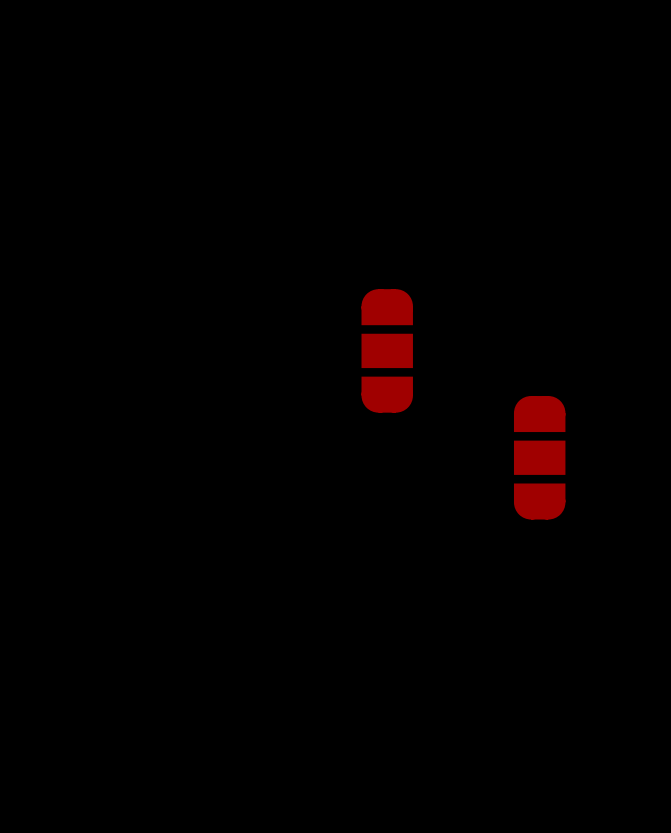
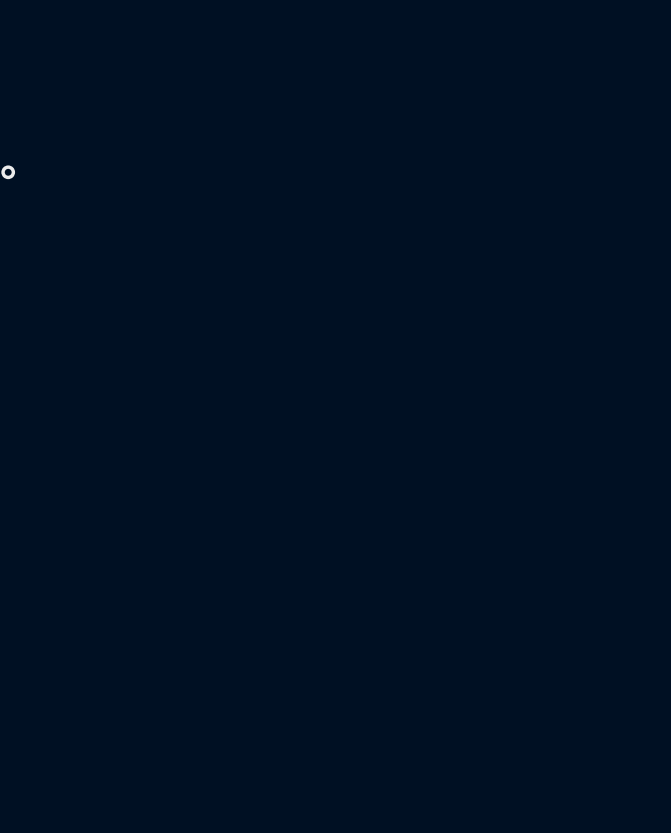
via: none -> (8, 172)
part: (387, 350) -> none
part: (539, 457) -> none

